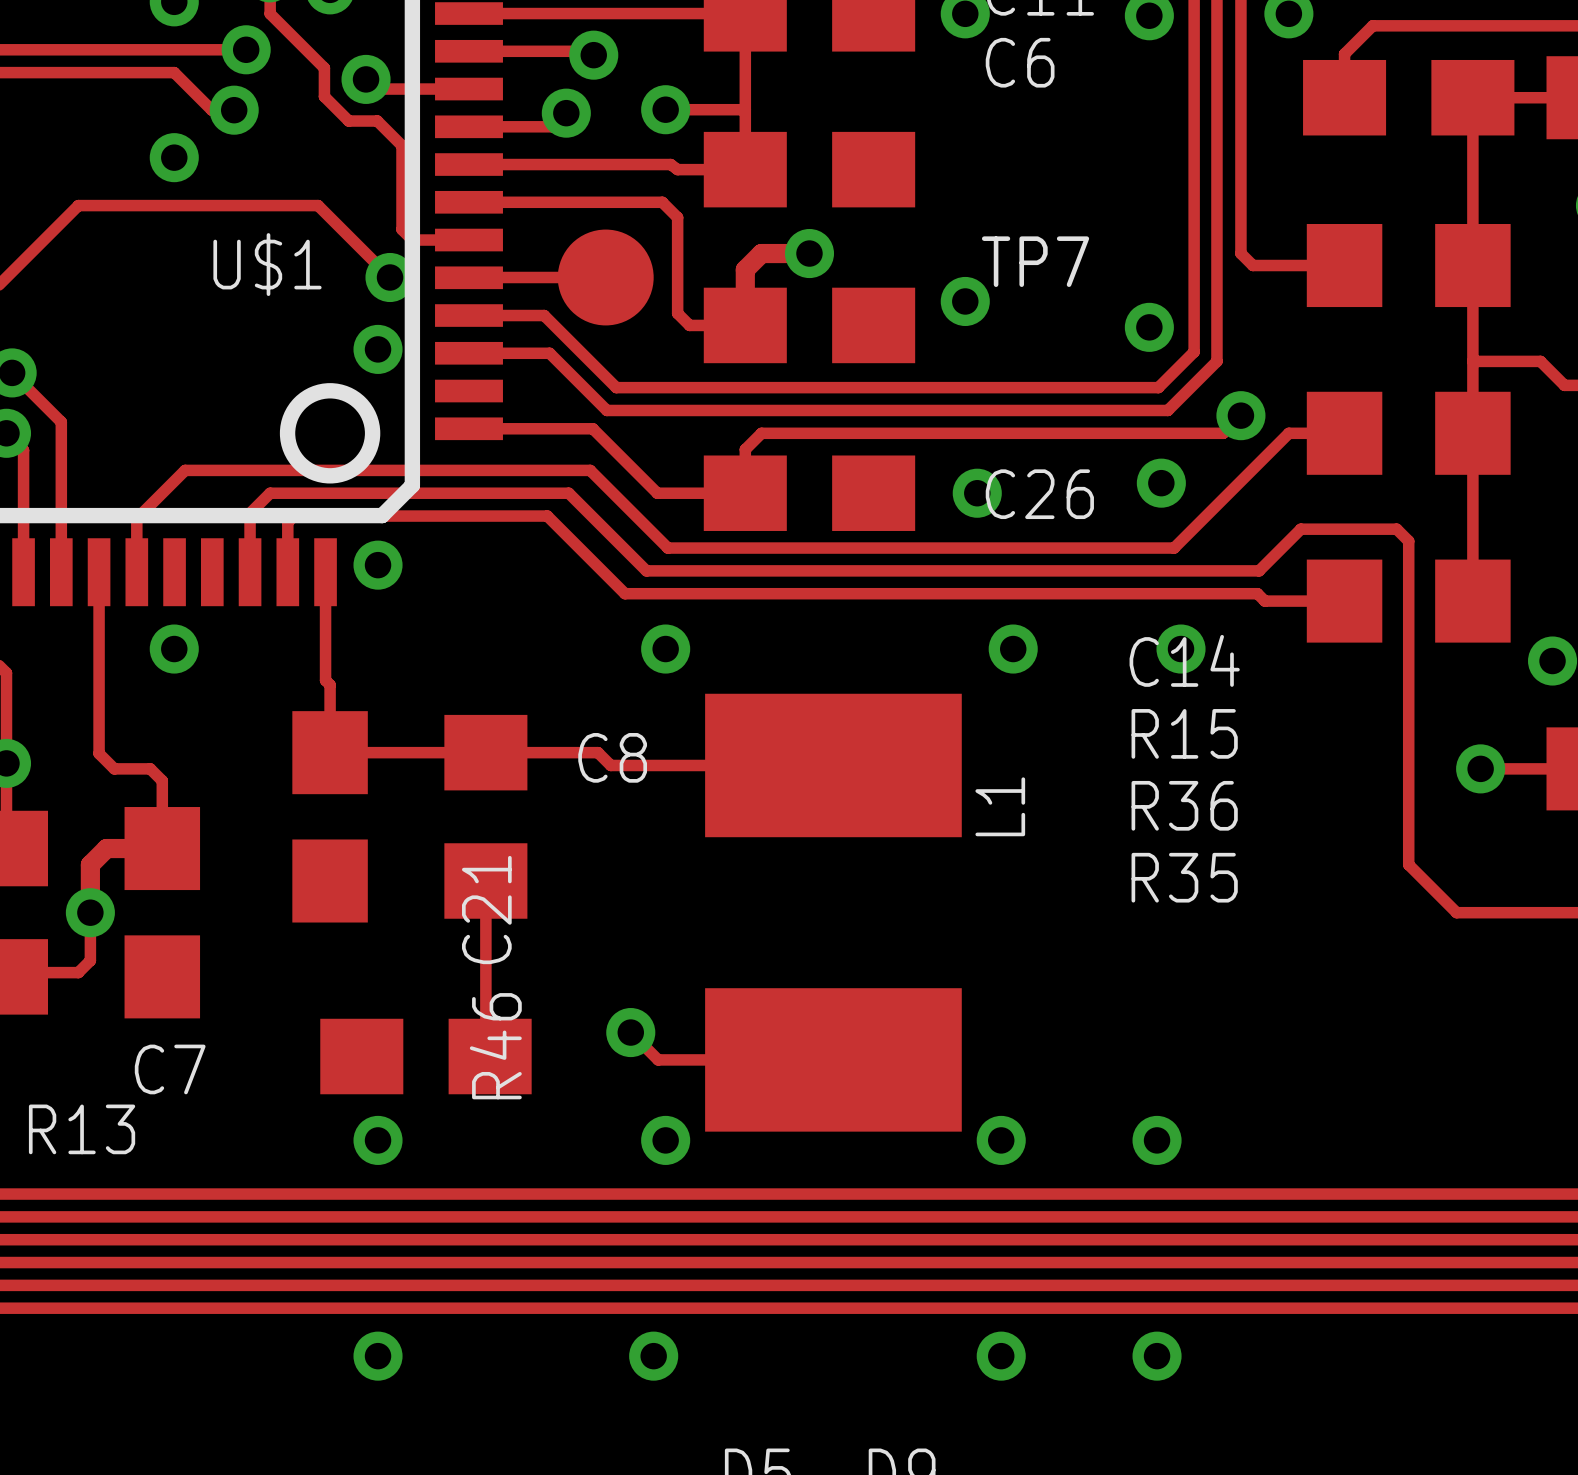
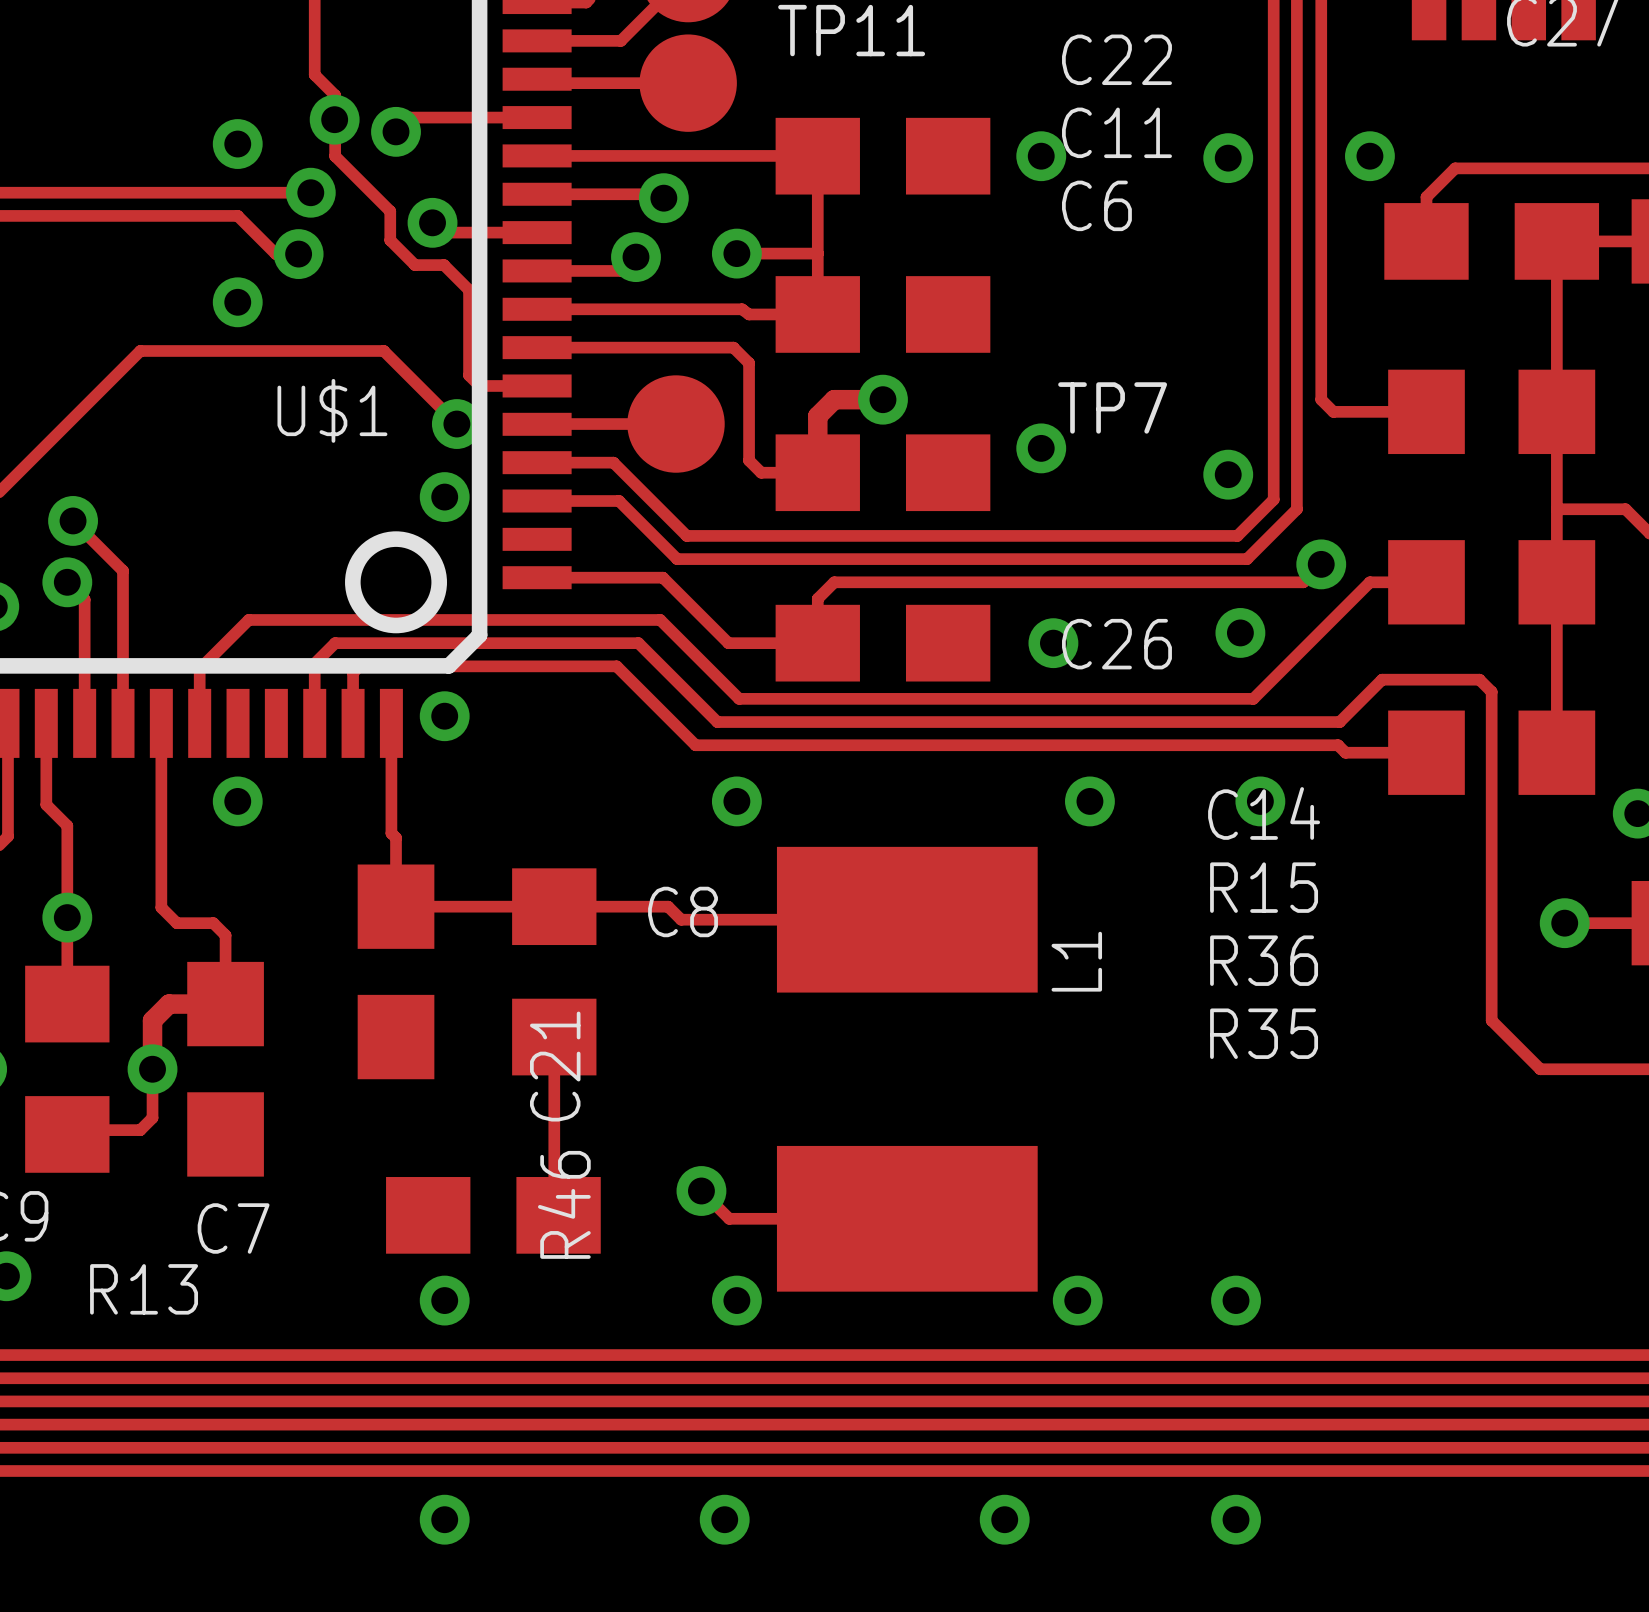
via position: (1001, 1356) -> (1004, 1519)

